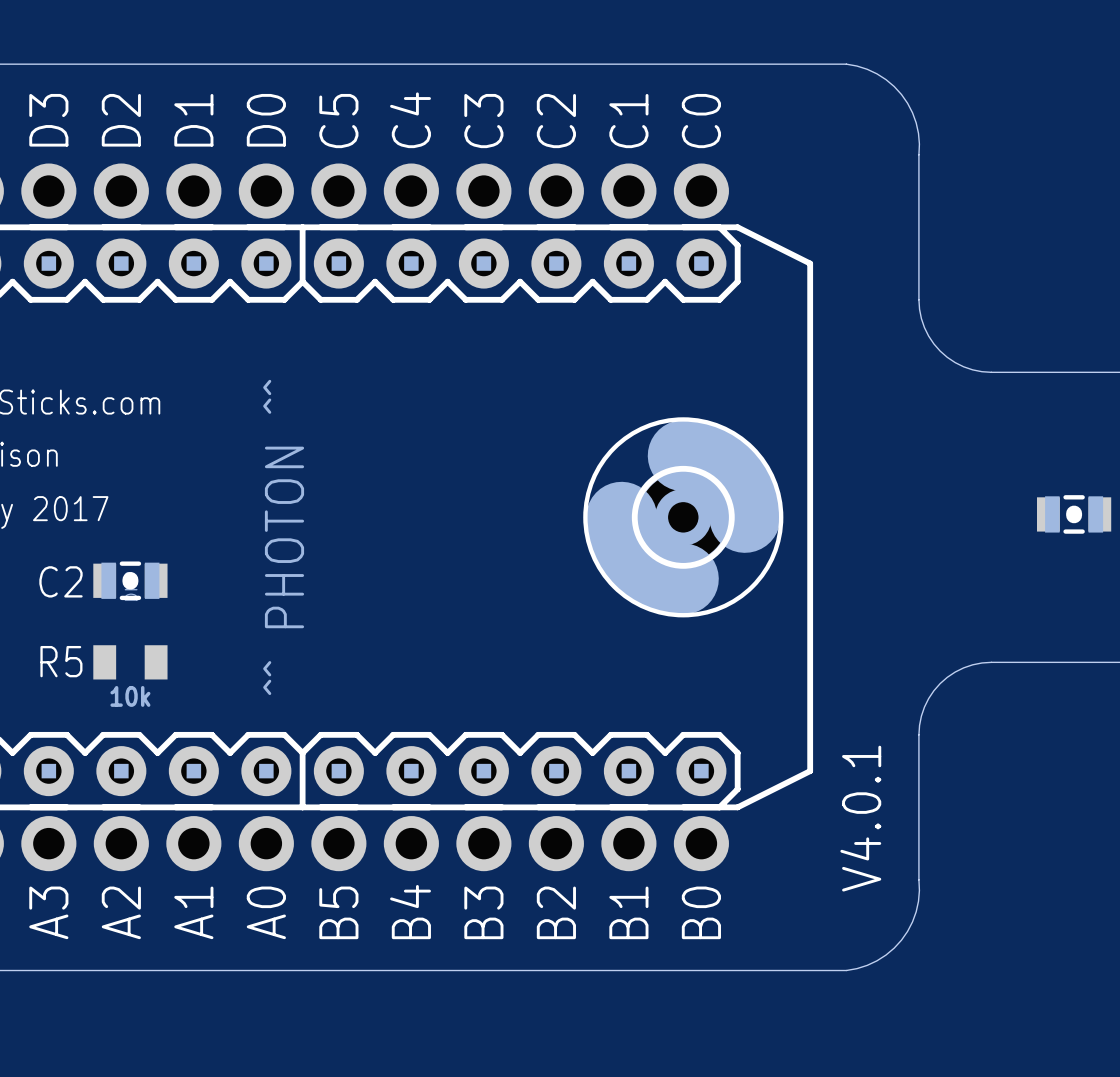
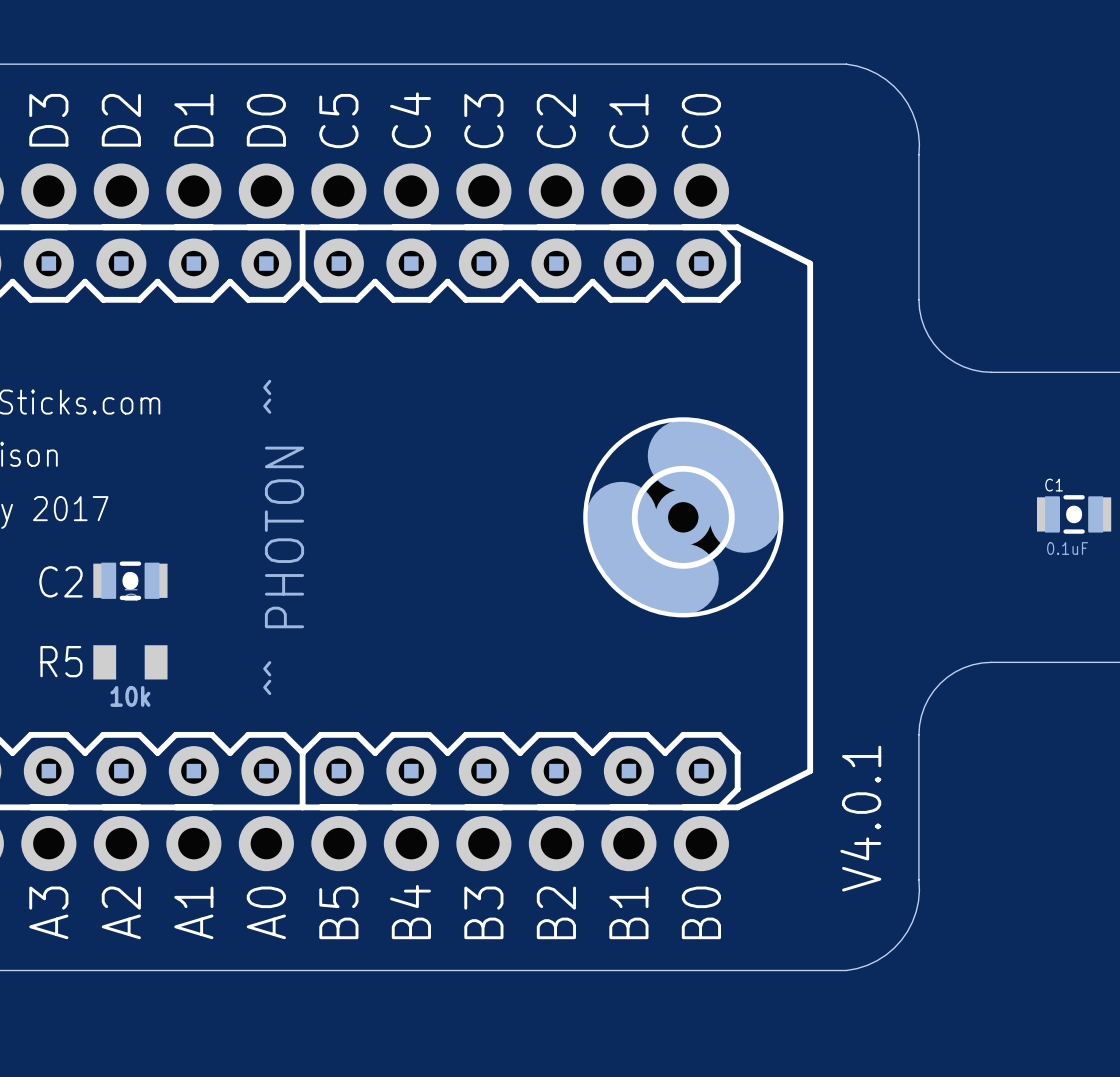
C1 name: none -> C1 (1054, 485)
C1 value: none -> 0.1uF (1067, 548)

